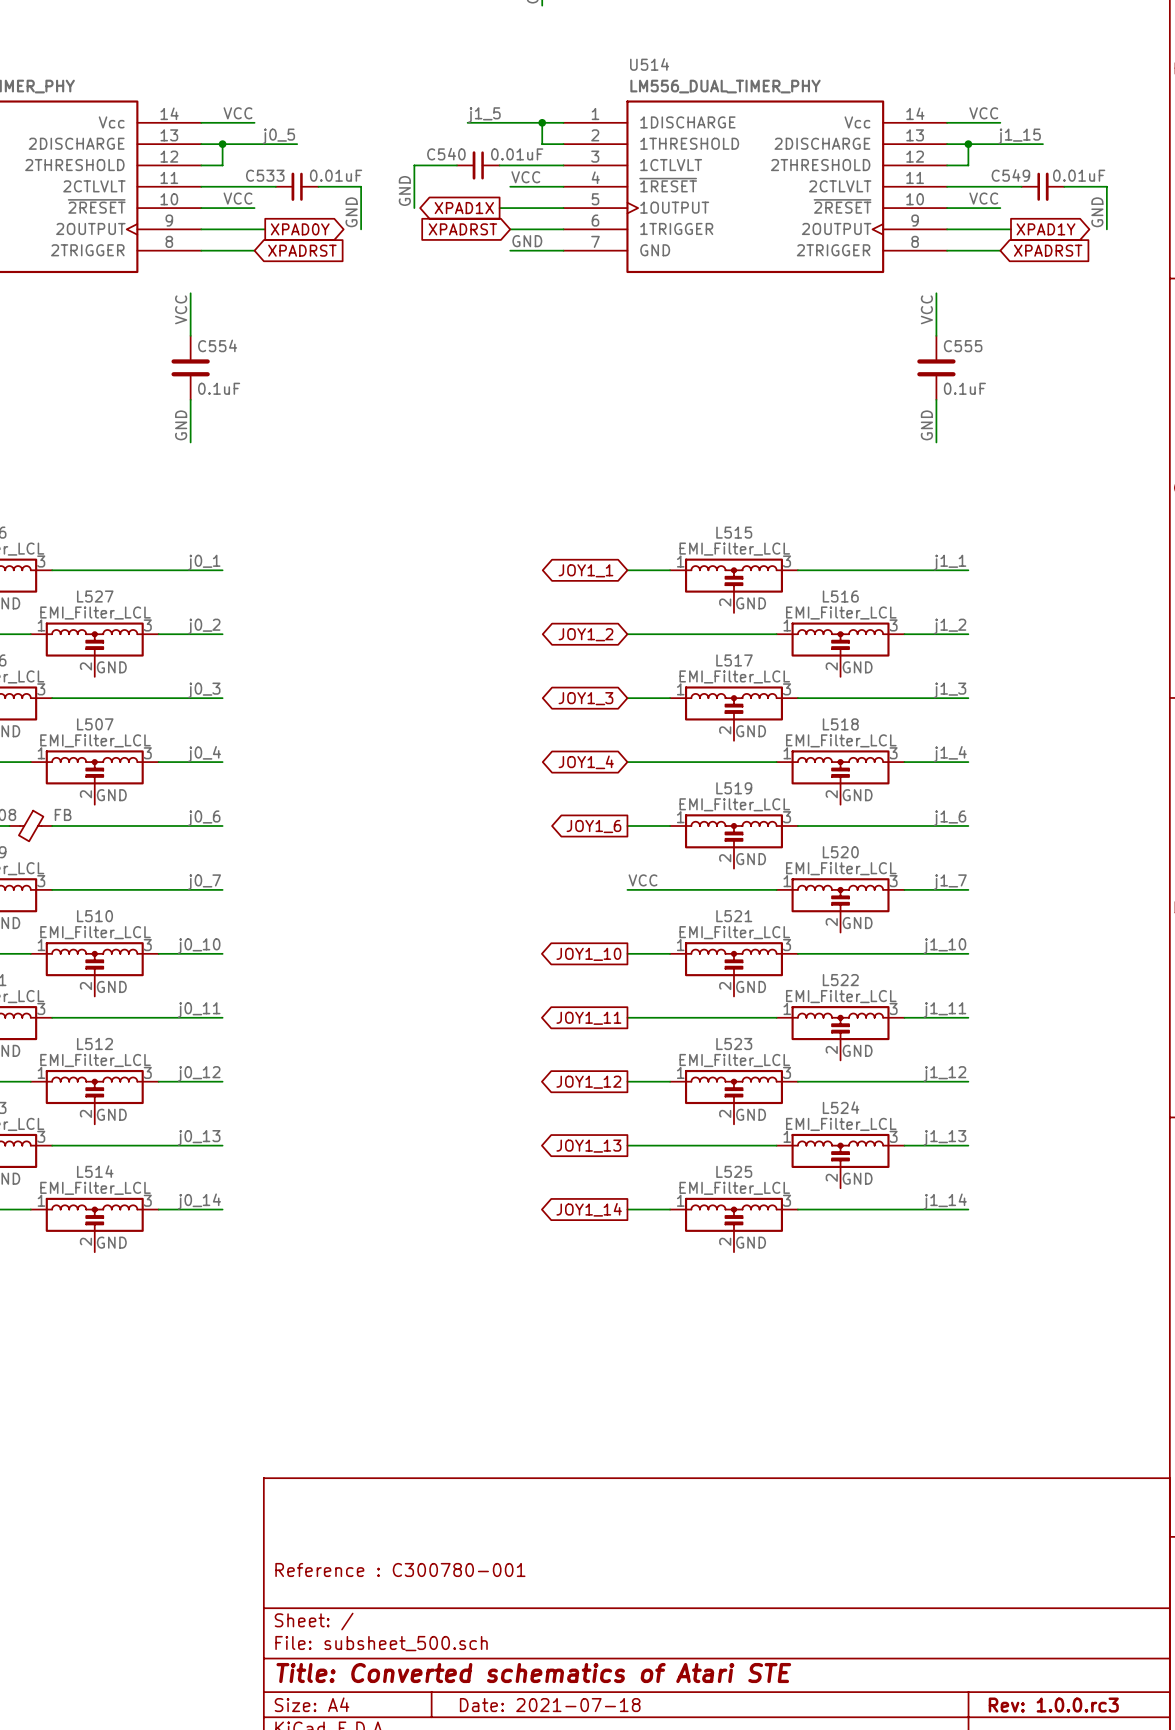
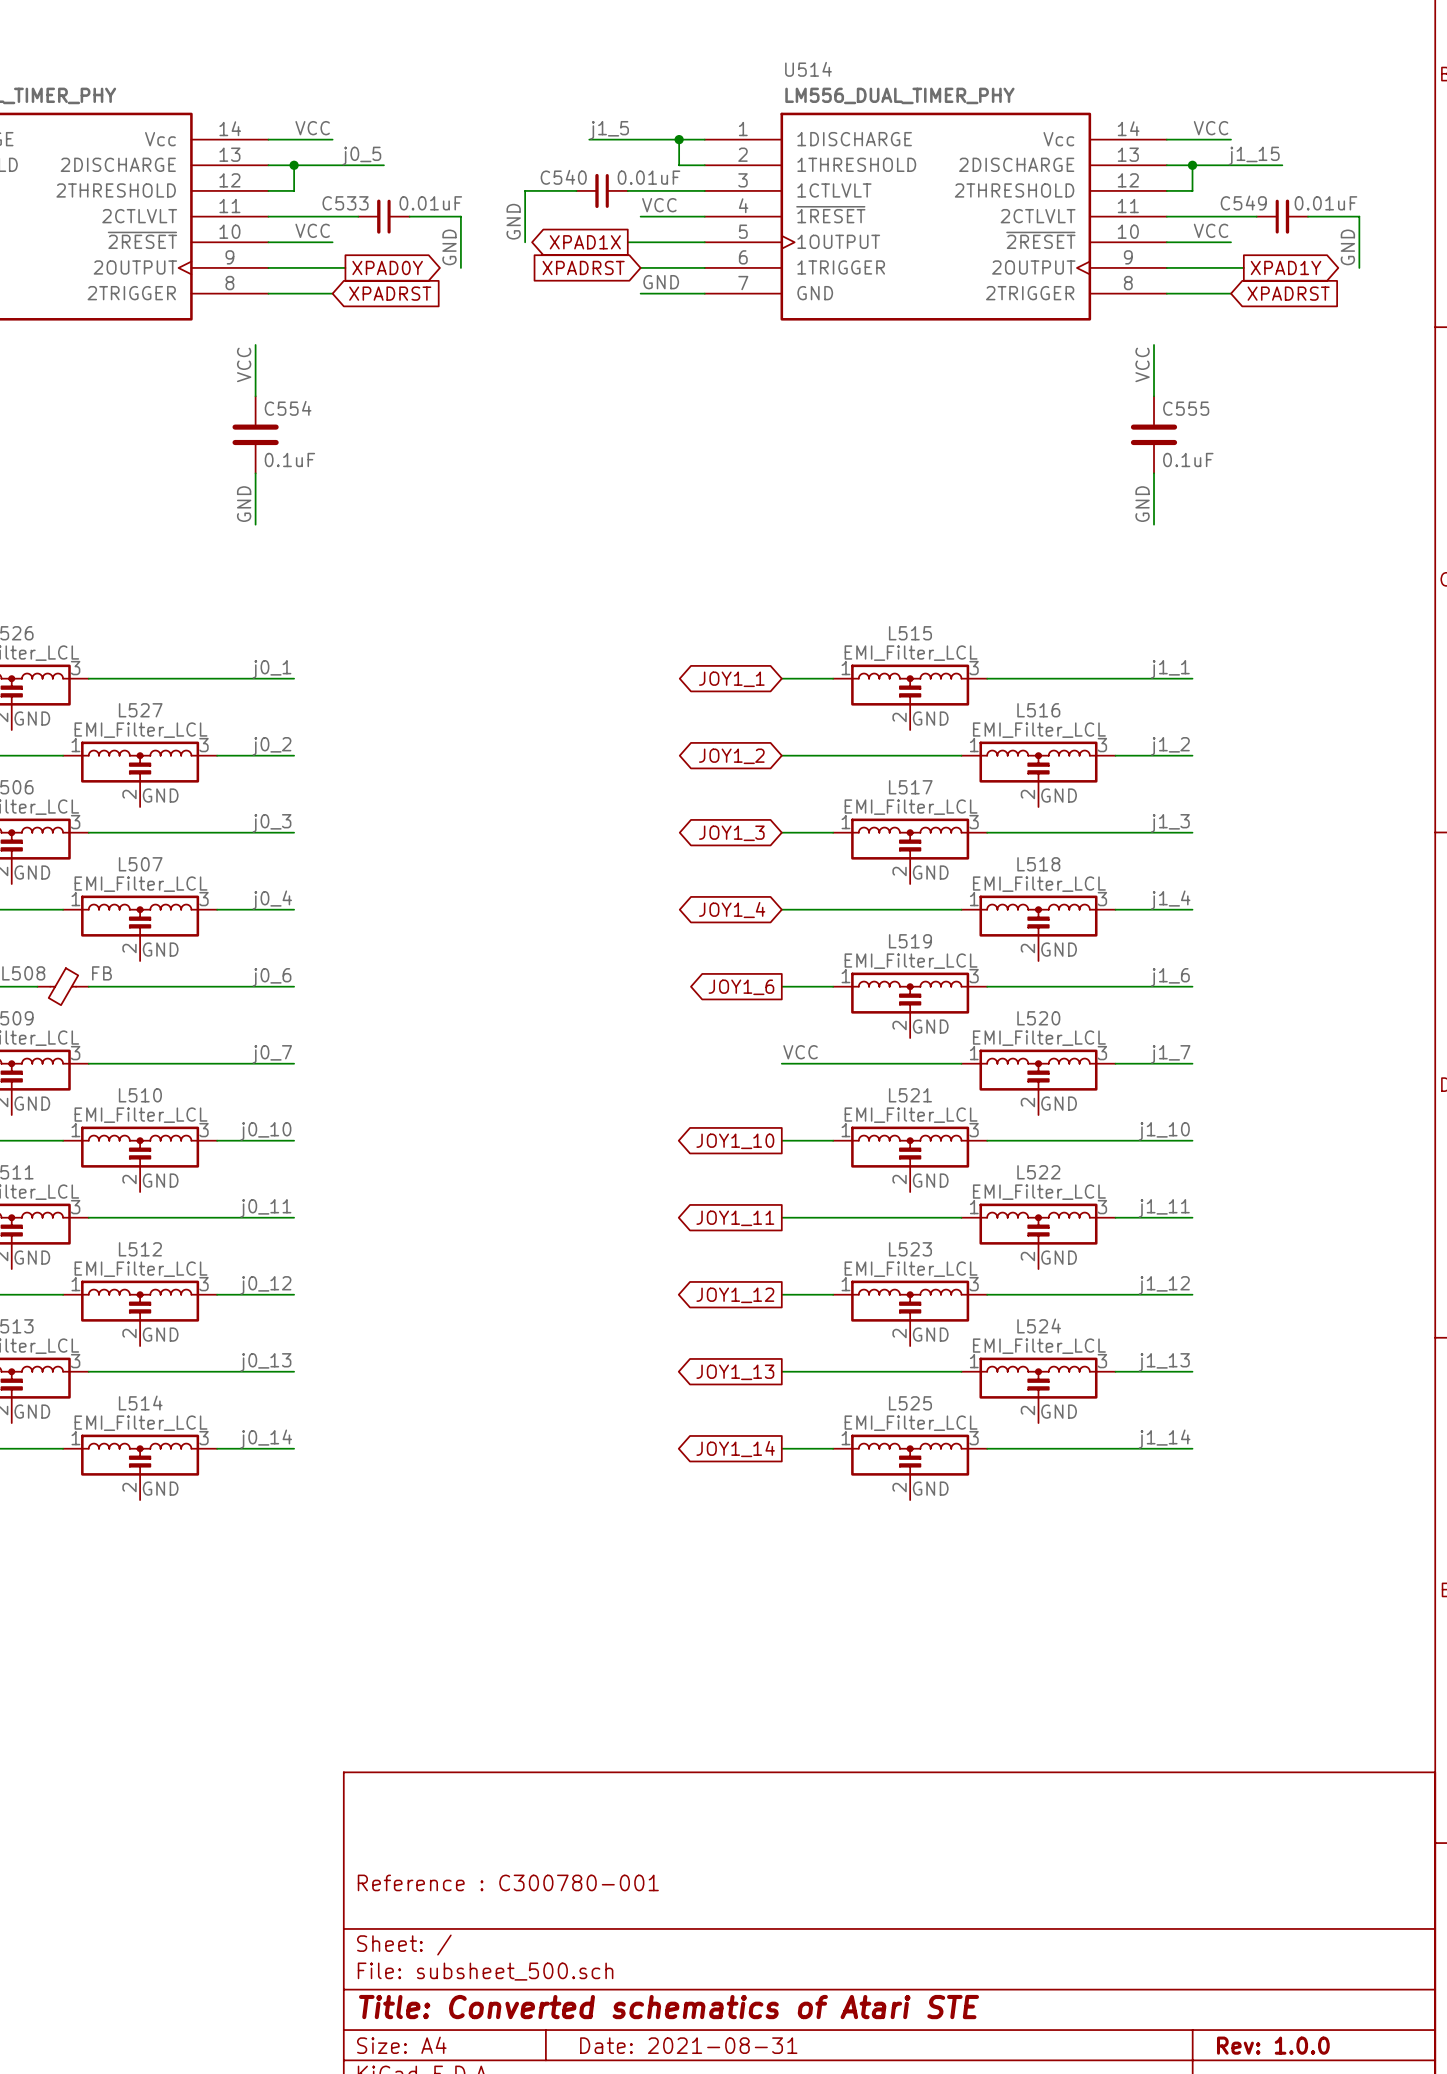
title block: Date: 2021-07-18 (550, 1705) -> Date: 2021-08-31 (688, 2045)
title block: Rev: 1.0.0.rc3 (1053, 1705) -> Rev: 1.0.0 (1273, 2045)

